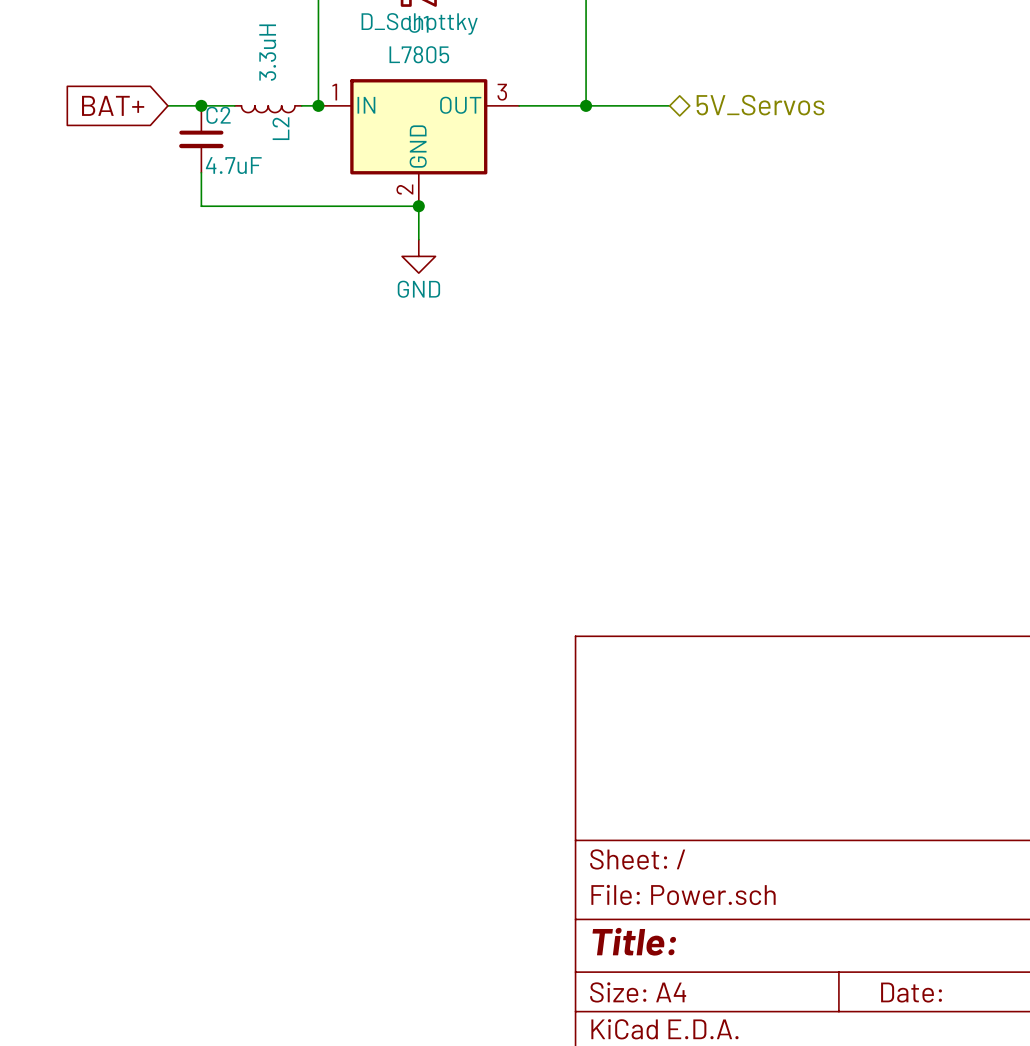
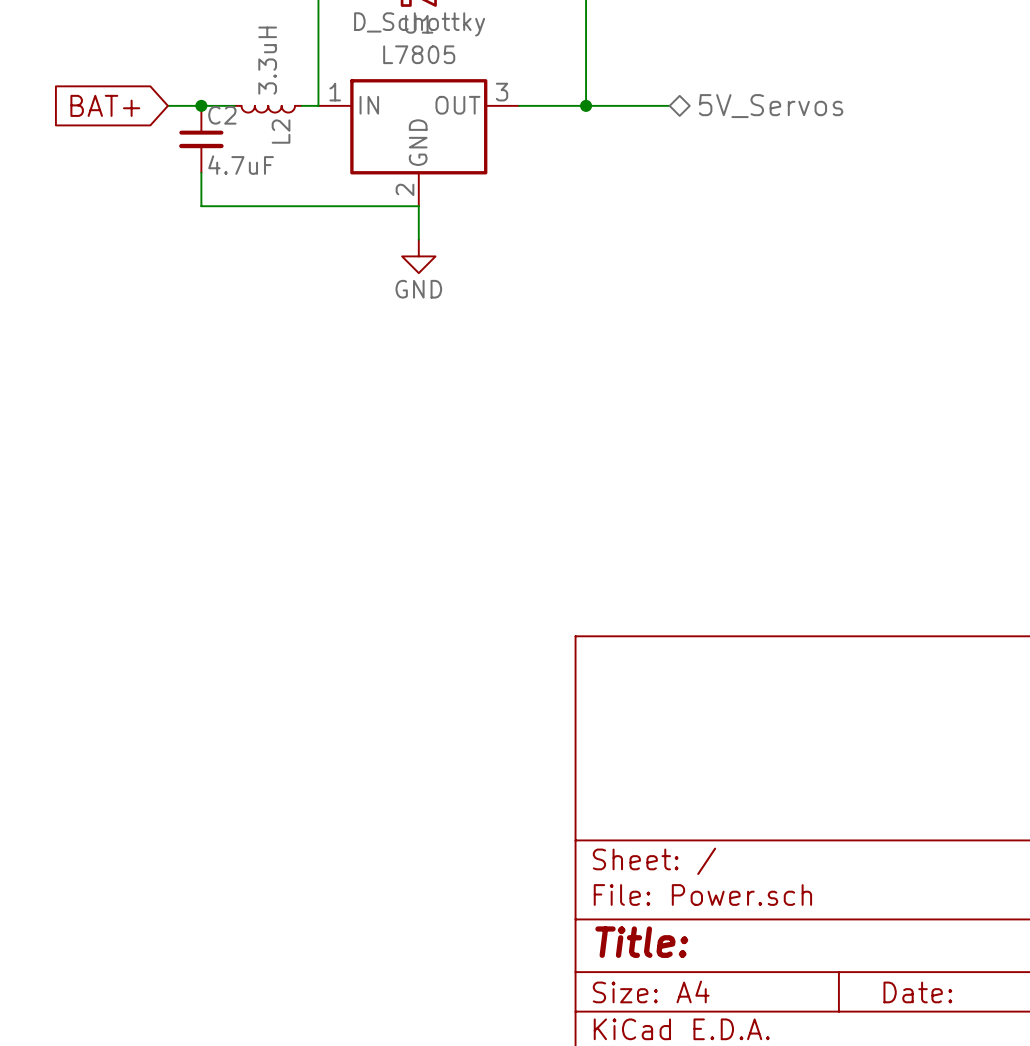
junction: (318, 105) -> none
junction: (418, 206) -> none

